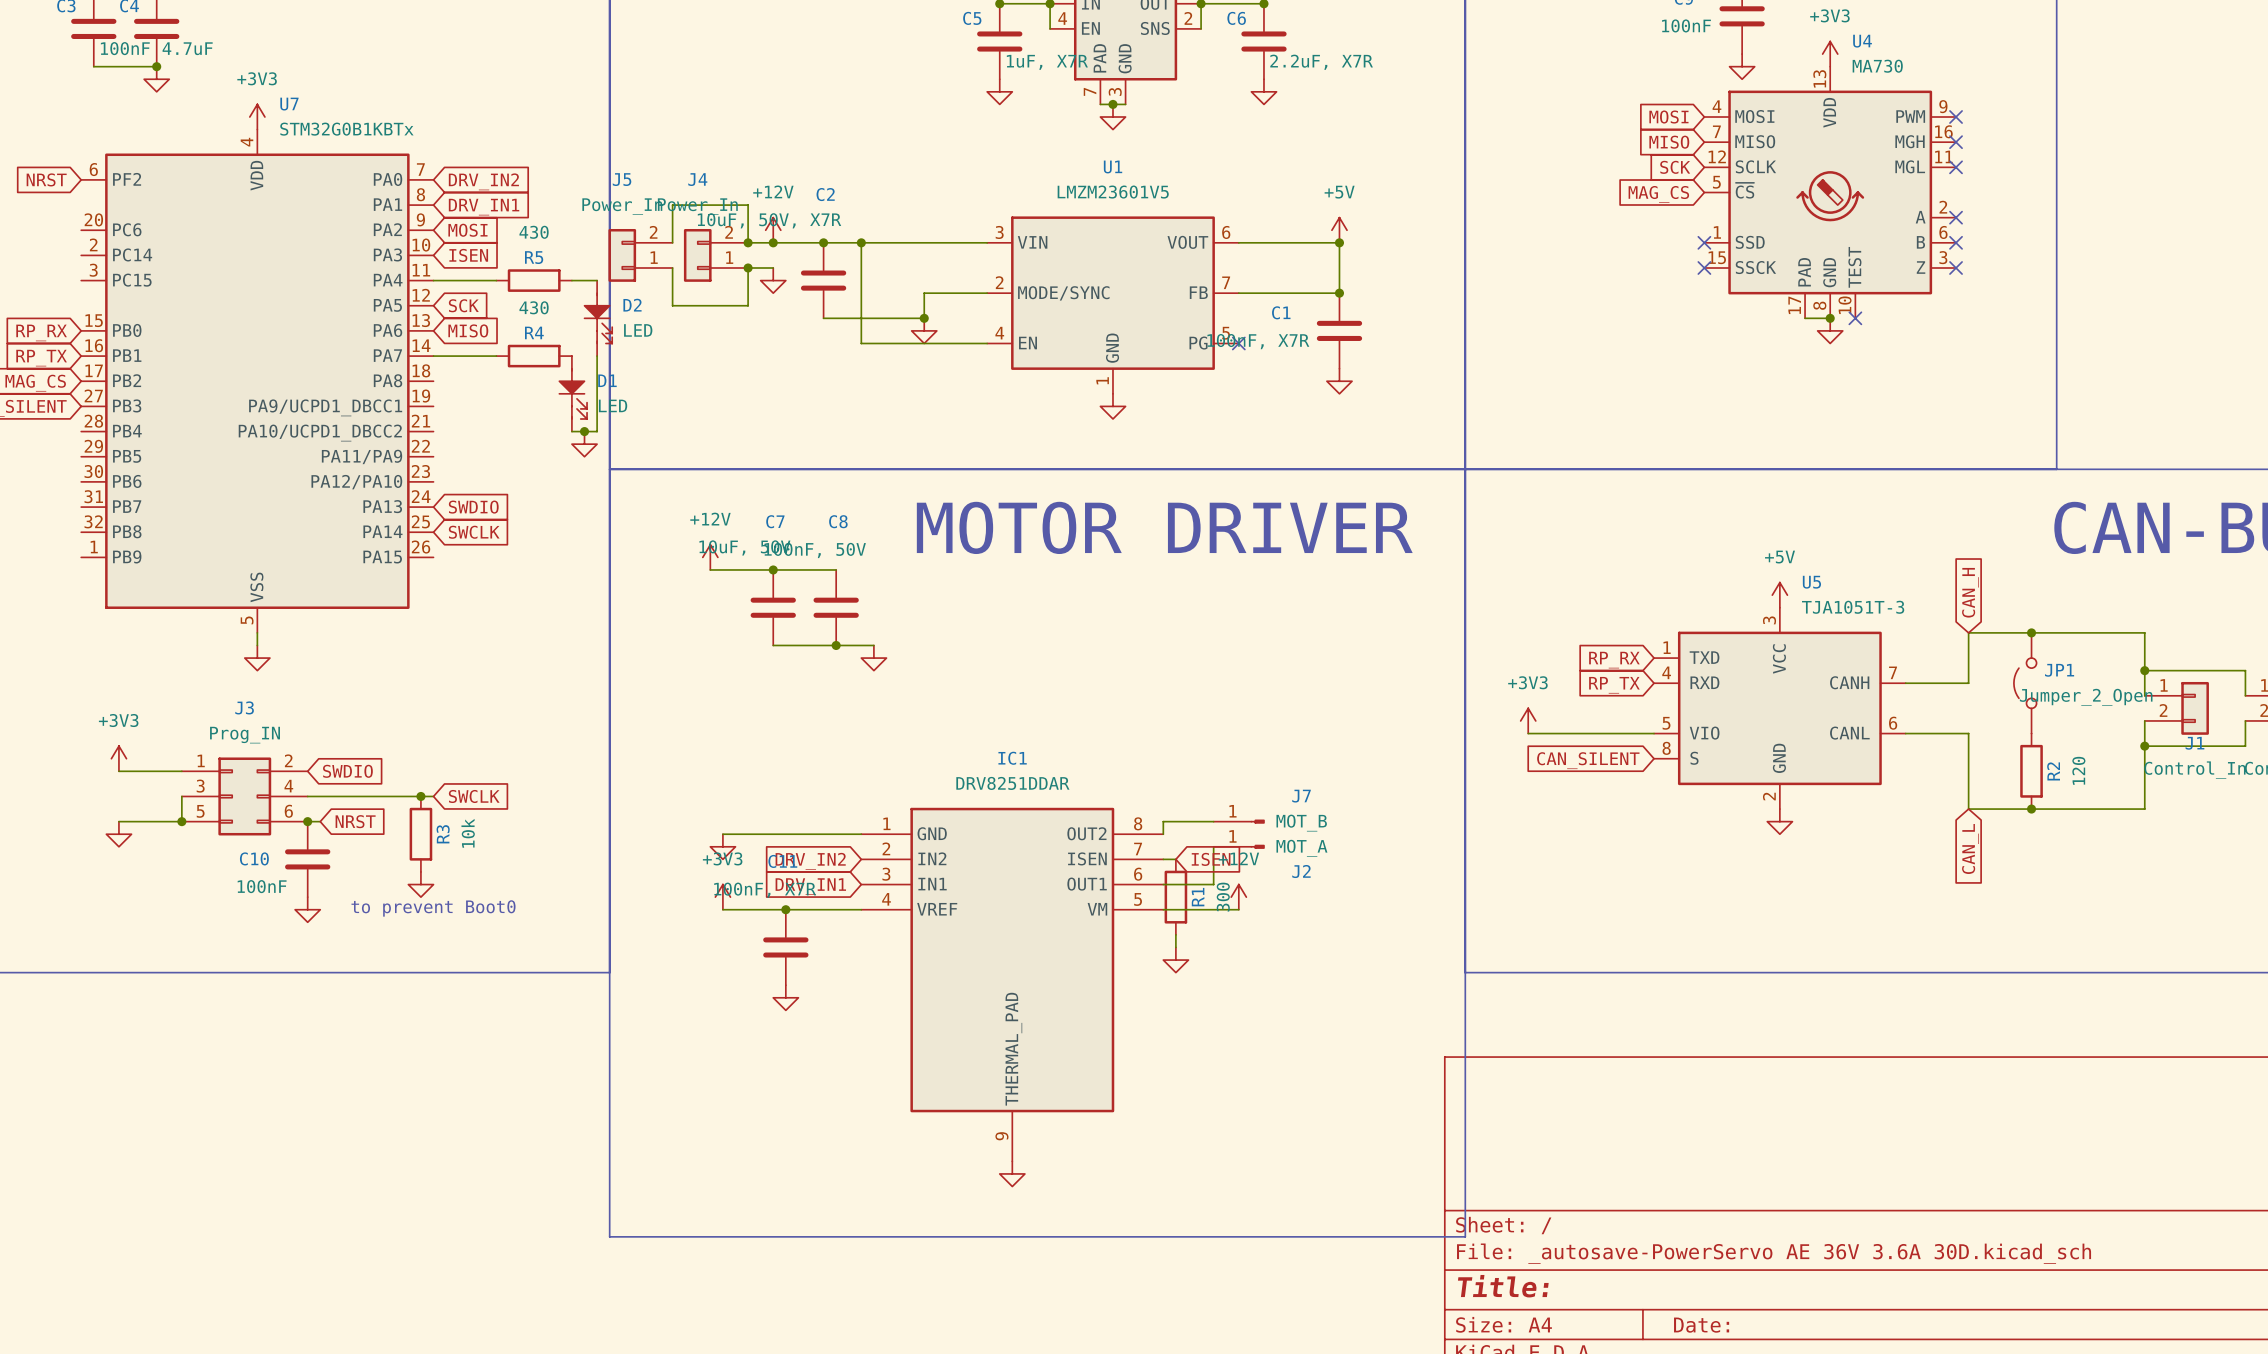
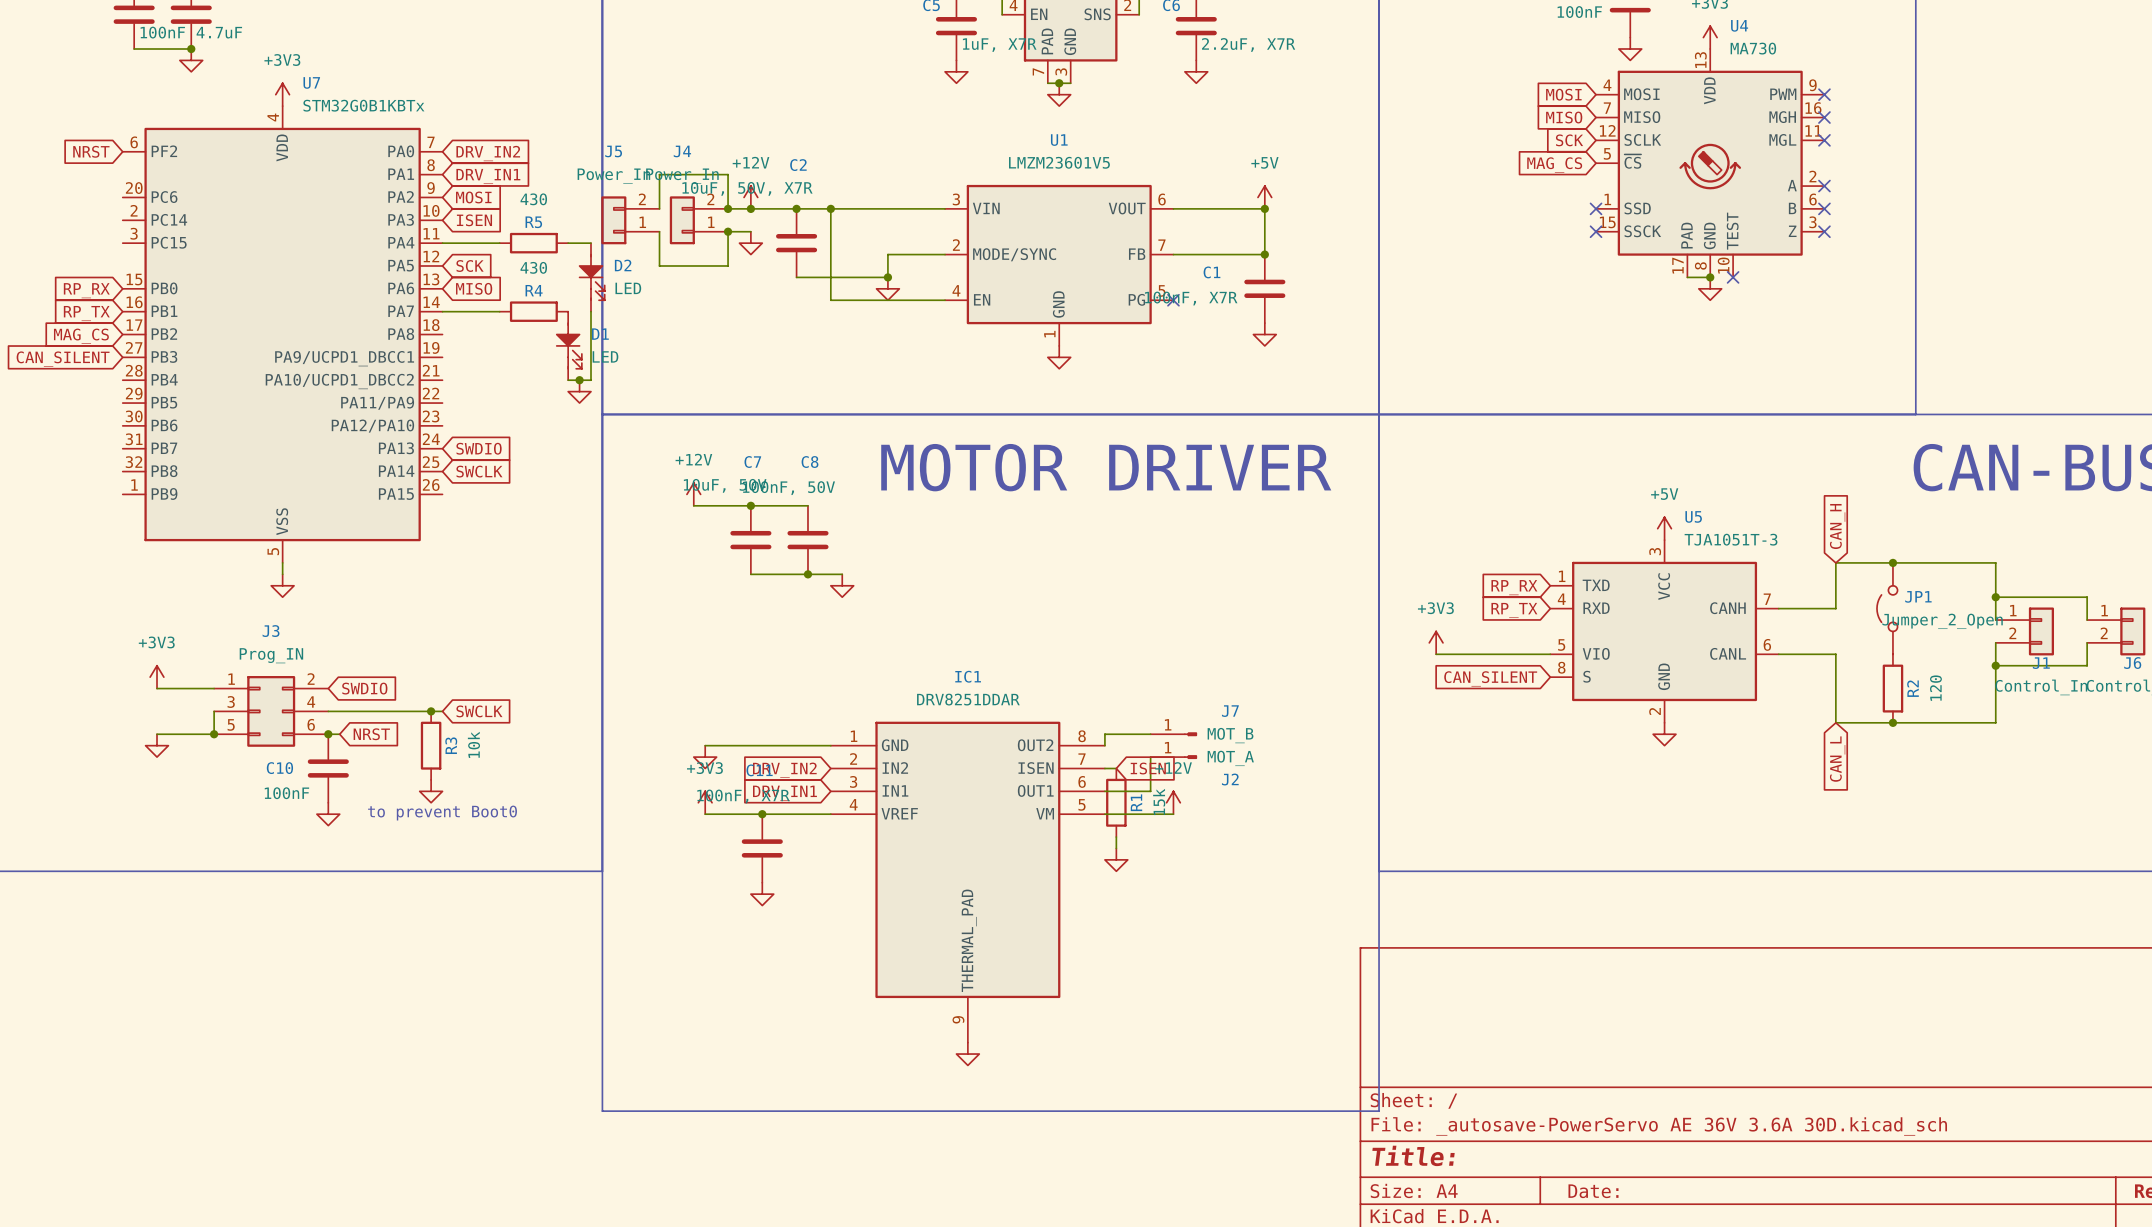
R1 value: 300 (1223, 897) -> 15k (1159, 801)

